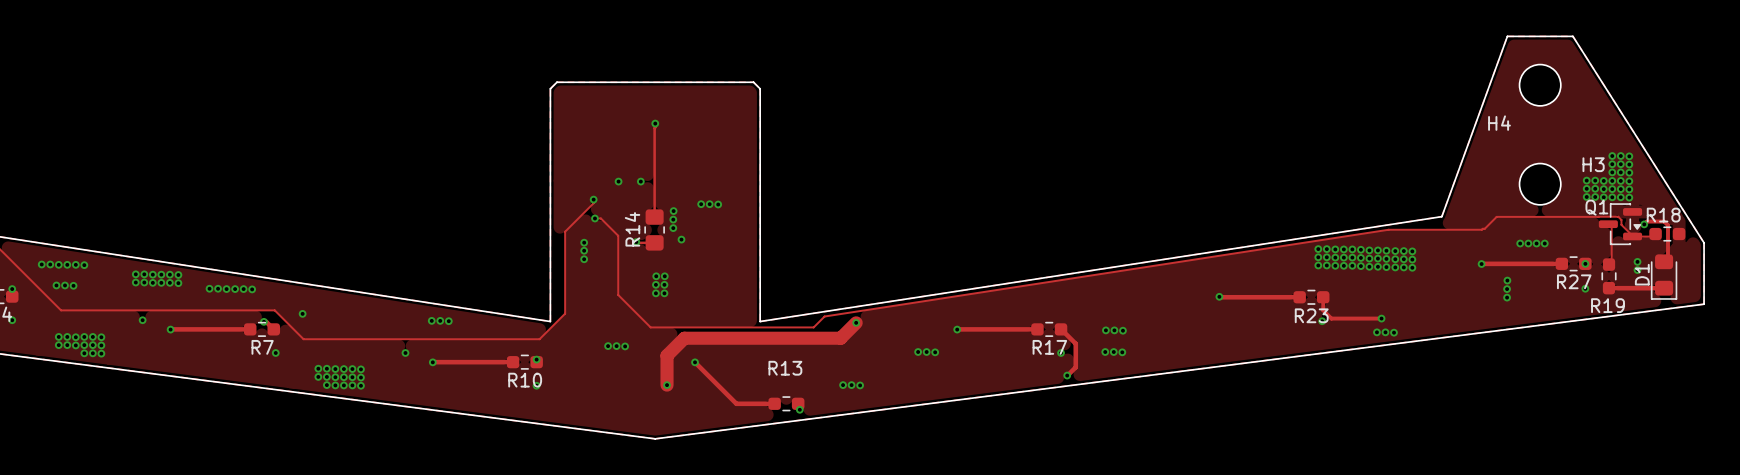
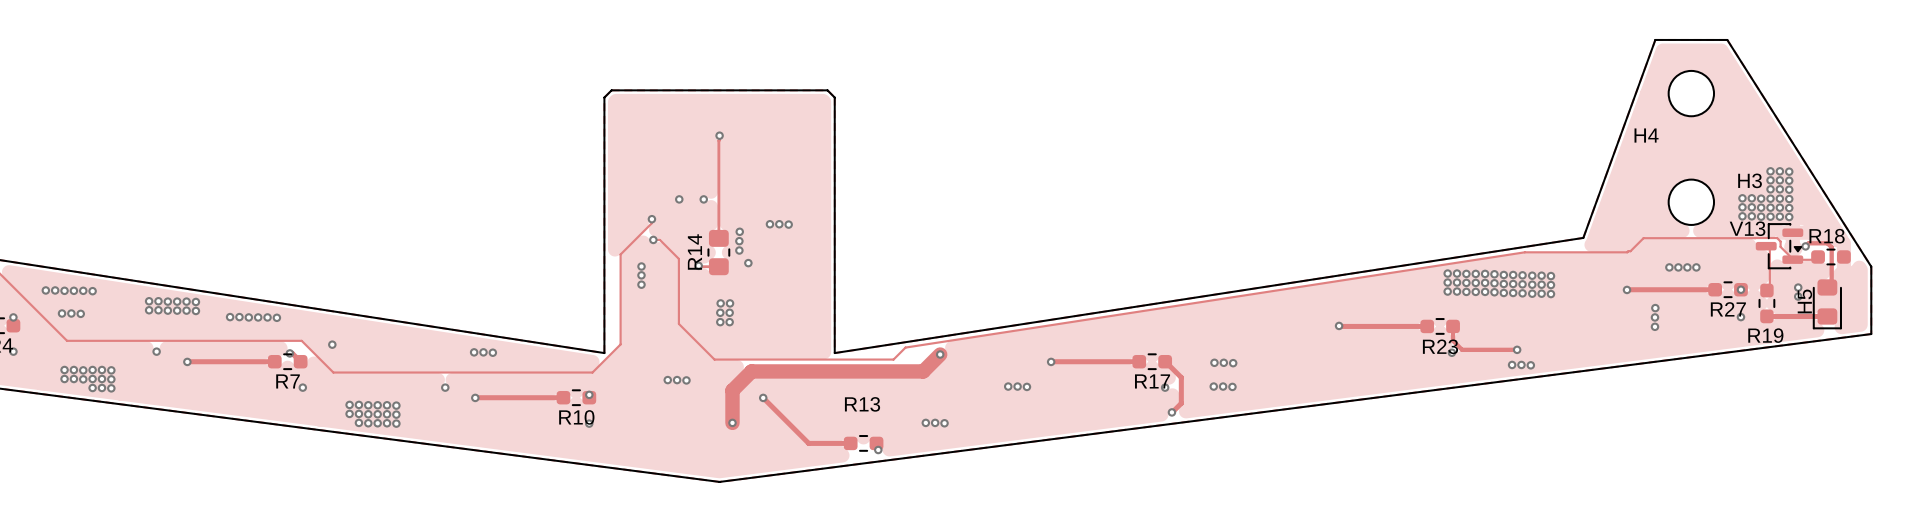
Q1 name: Q1 (1596, 207) -> V13 (1747, 228)
D1 name: D1 (1642, 274) -> H5 (1804, 301)

